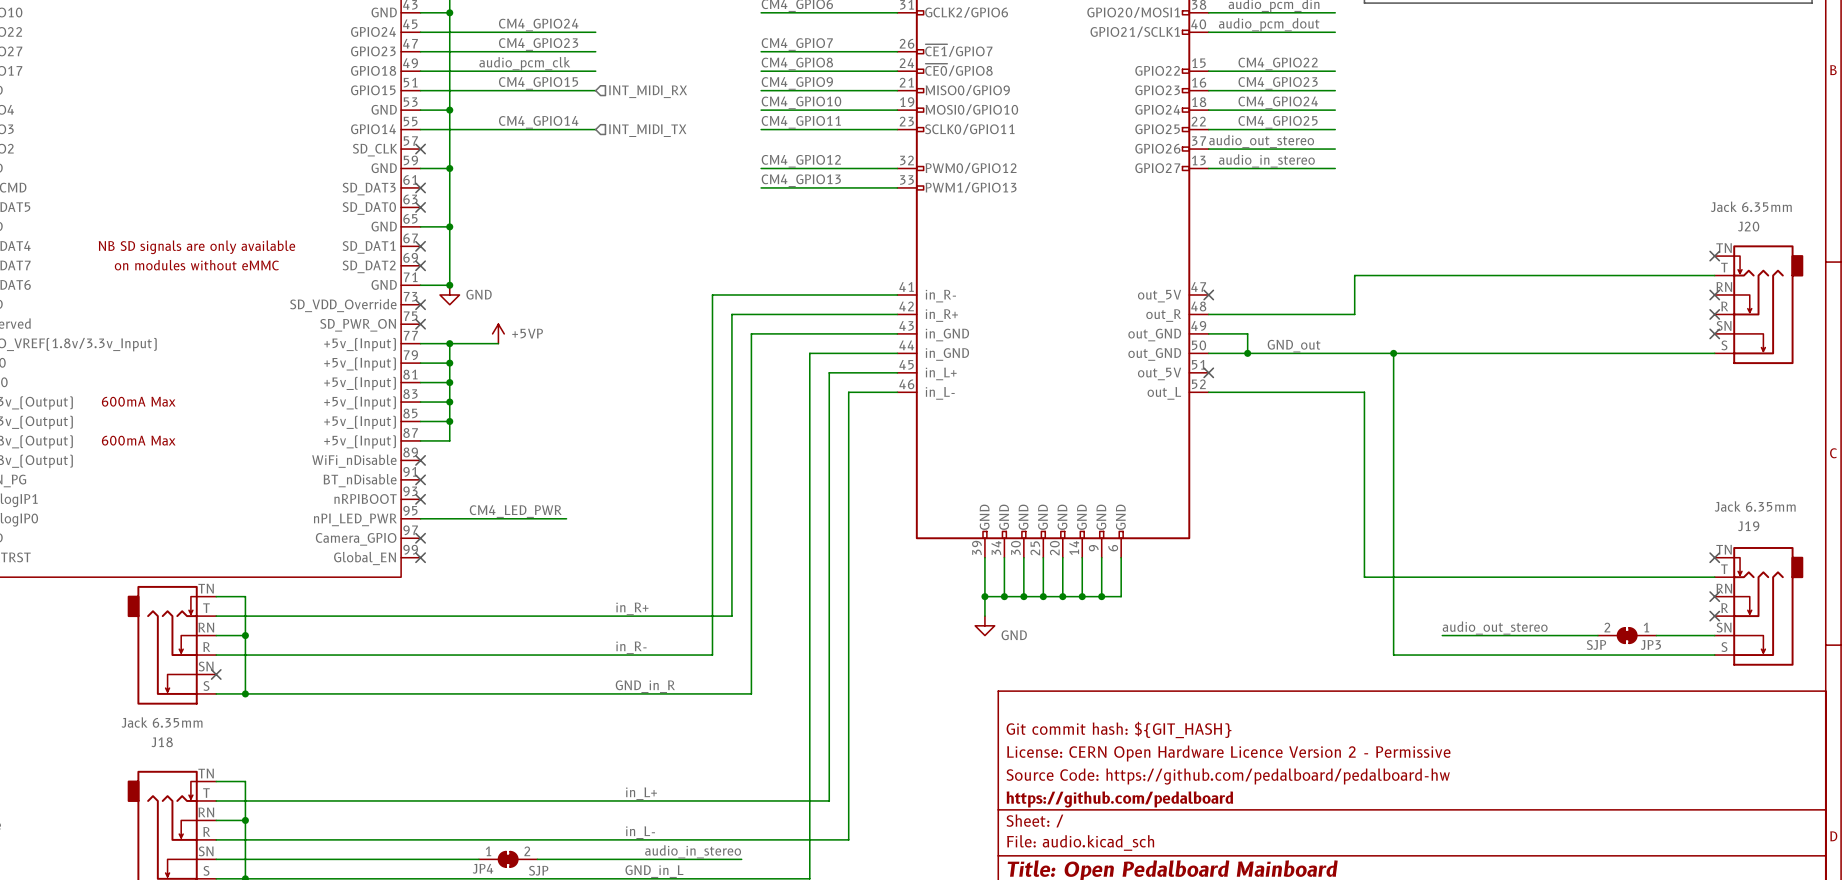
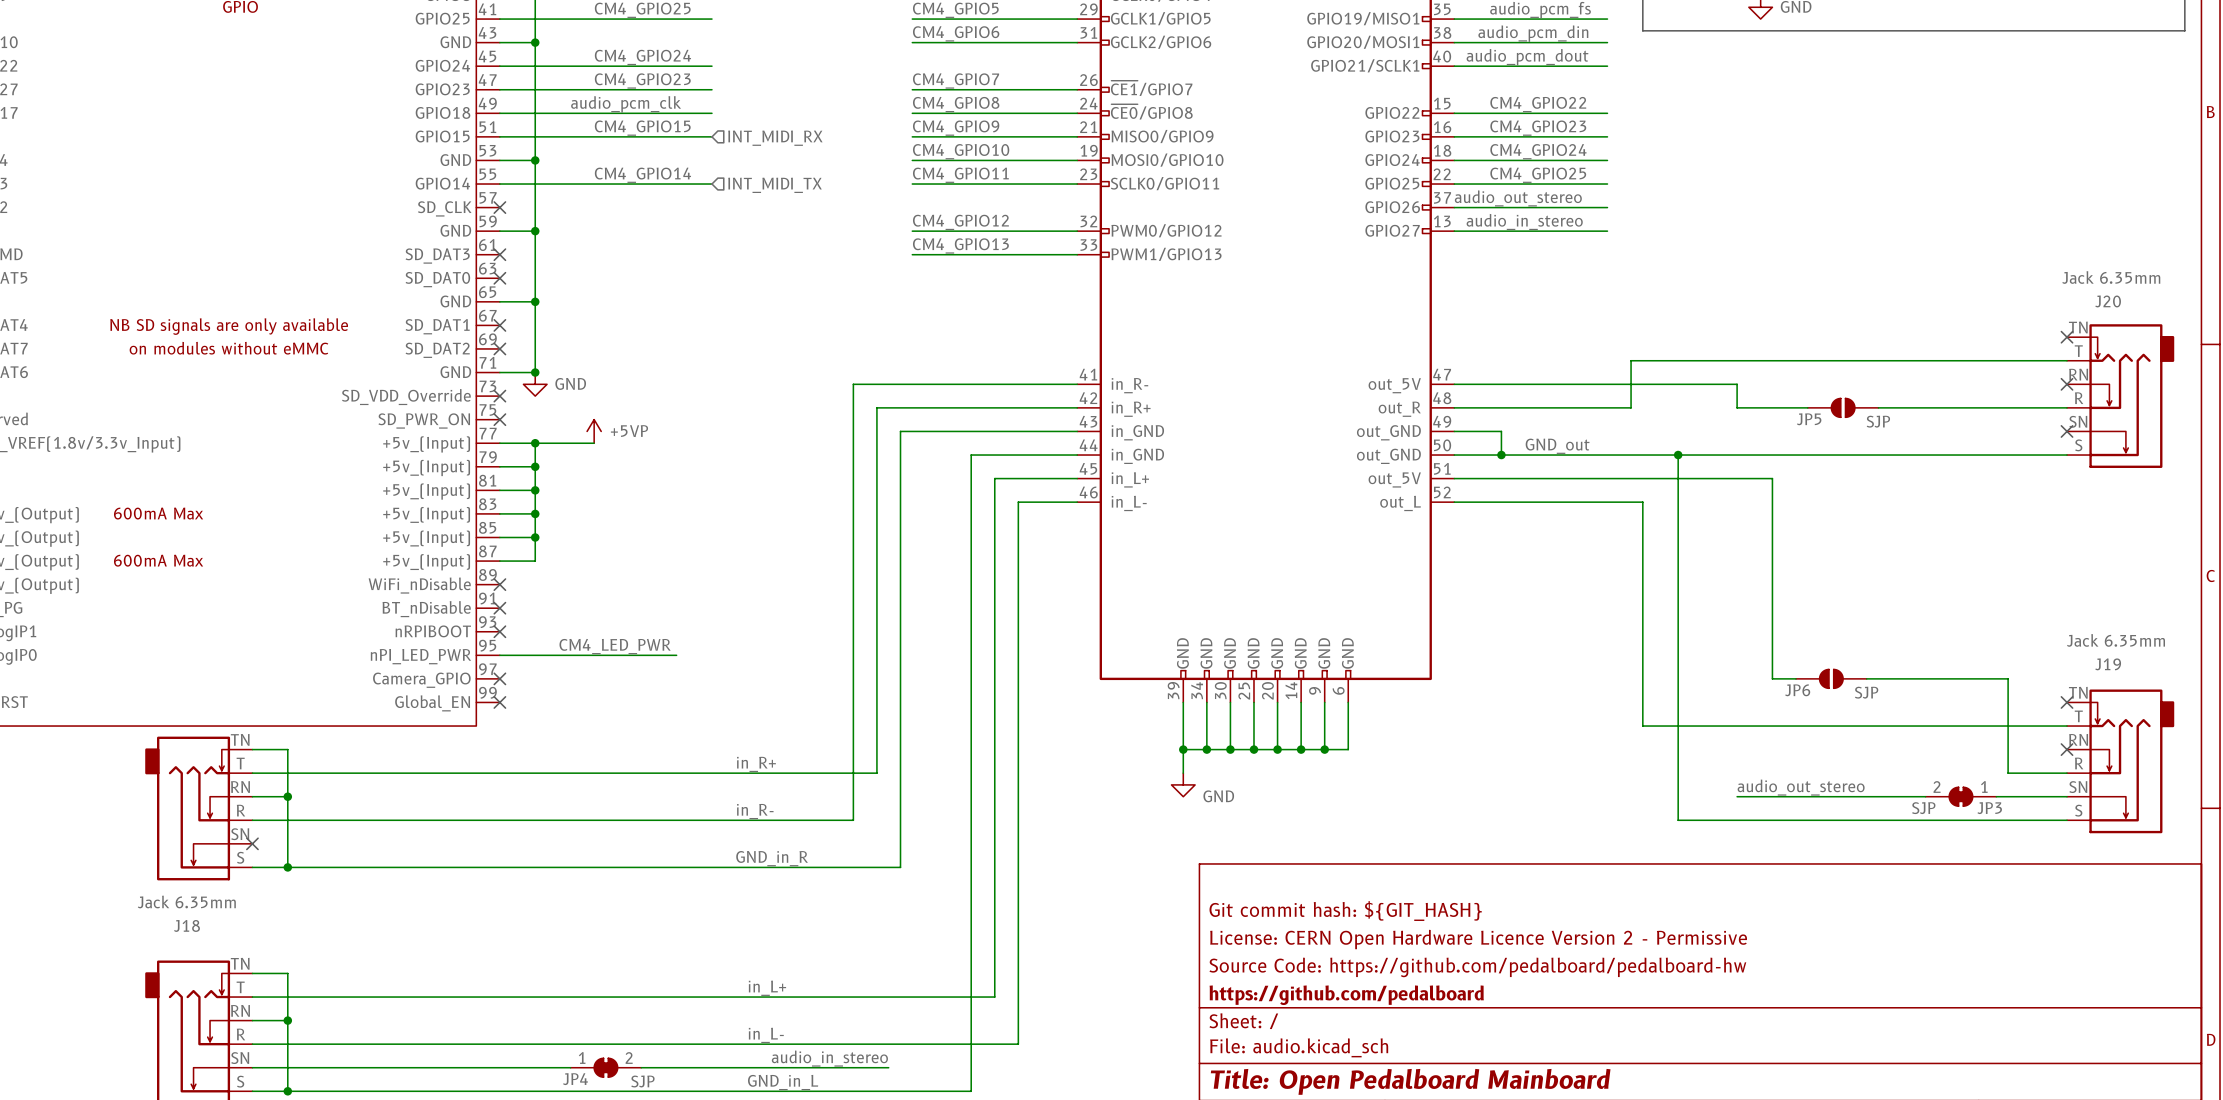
wire: none -> (1454, 384) (1737, 384) (1737, 407) (1807, 407)
no-connect mark: (1208, 294) -> none
JP5: none -> SJP (1843, 407)
wire: none -> (1878, 407) (2067, 407)
no-connect mark: (1714, 314) -> none
wire: none -> (1454, 478) (1772, 478) (1772, 678) (1796, 678)
no-connect mark: (1208, 372) -> none
JP6: none -> SJP (1831, 678)
wire: none -> (1866, 678) (2008, 678) (2008, 773) (2067, 773)
no-connect mark: (1714, 616) -> none

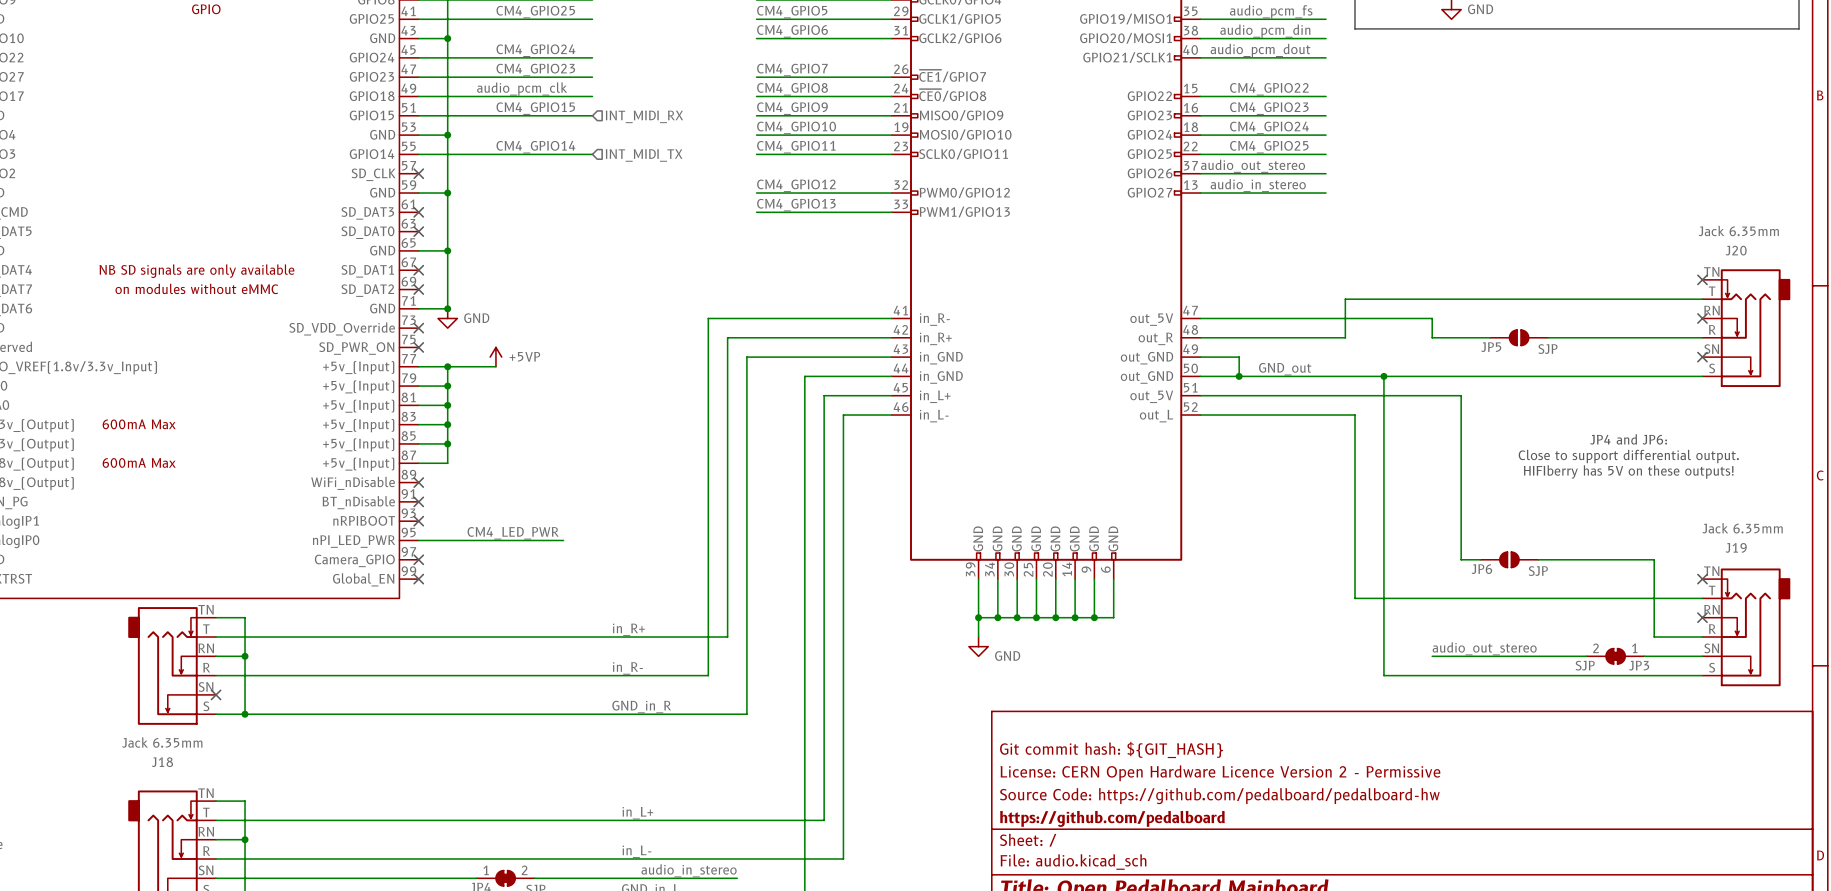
text: none -> JP4 and JP6: (1628, 439)
text: none -> Close to support differential output. (1628, 456)
text: none -> HIFIberry has 5V on these outputs! (1628, 472)

